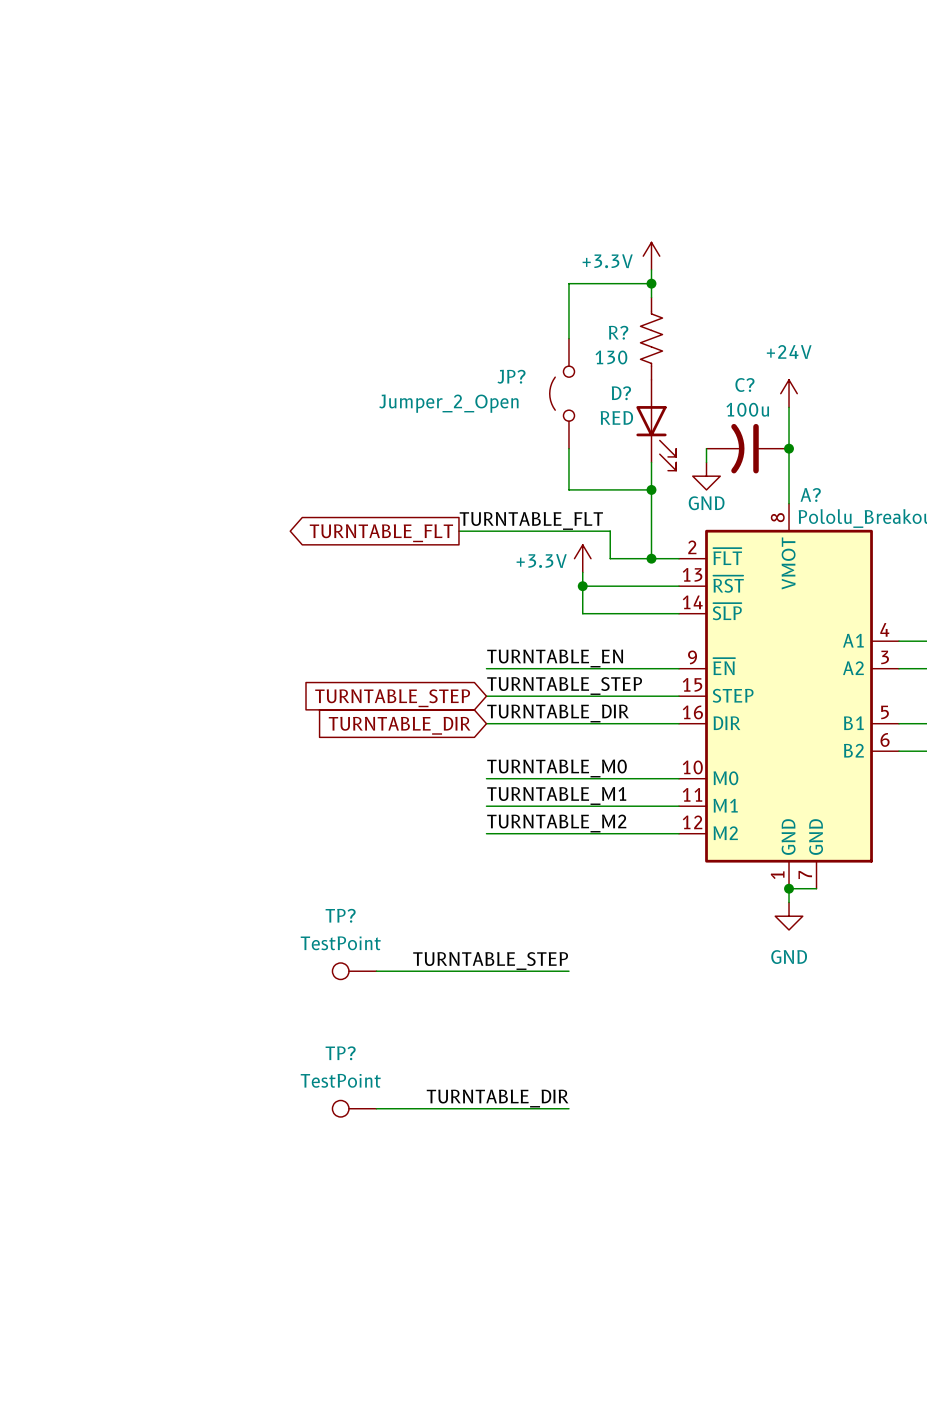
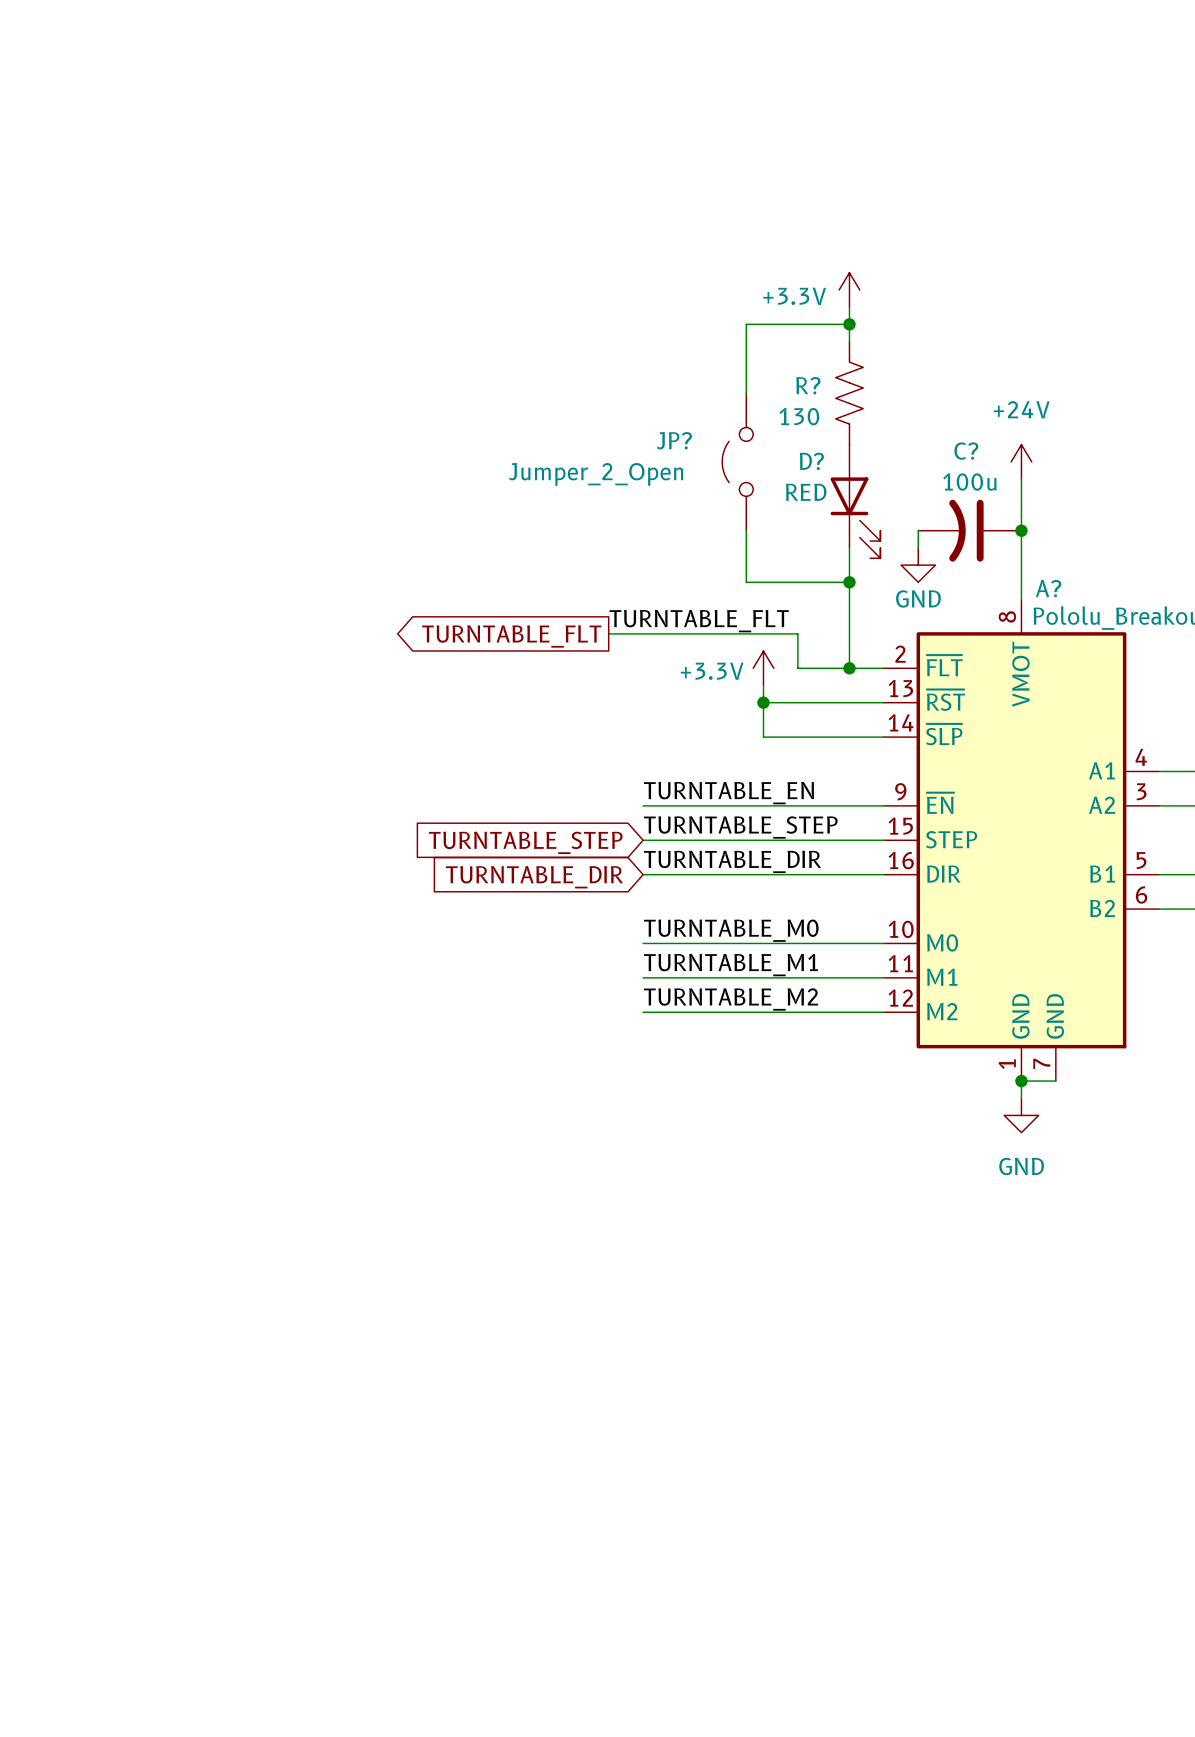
label: TURNTABLE_STEP (490, 961) -> none
TP?: TestPoint (354, 971) -> none
wire: (376, 971) (568, 971) -> none
label: TURNTABLE_DIR (497, 1098) -> none
TP?: TestPoint (354, 1108) -> none
wire: (376, 1108) (568, 1108) -> none

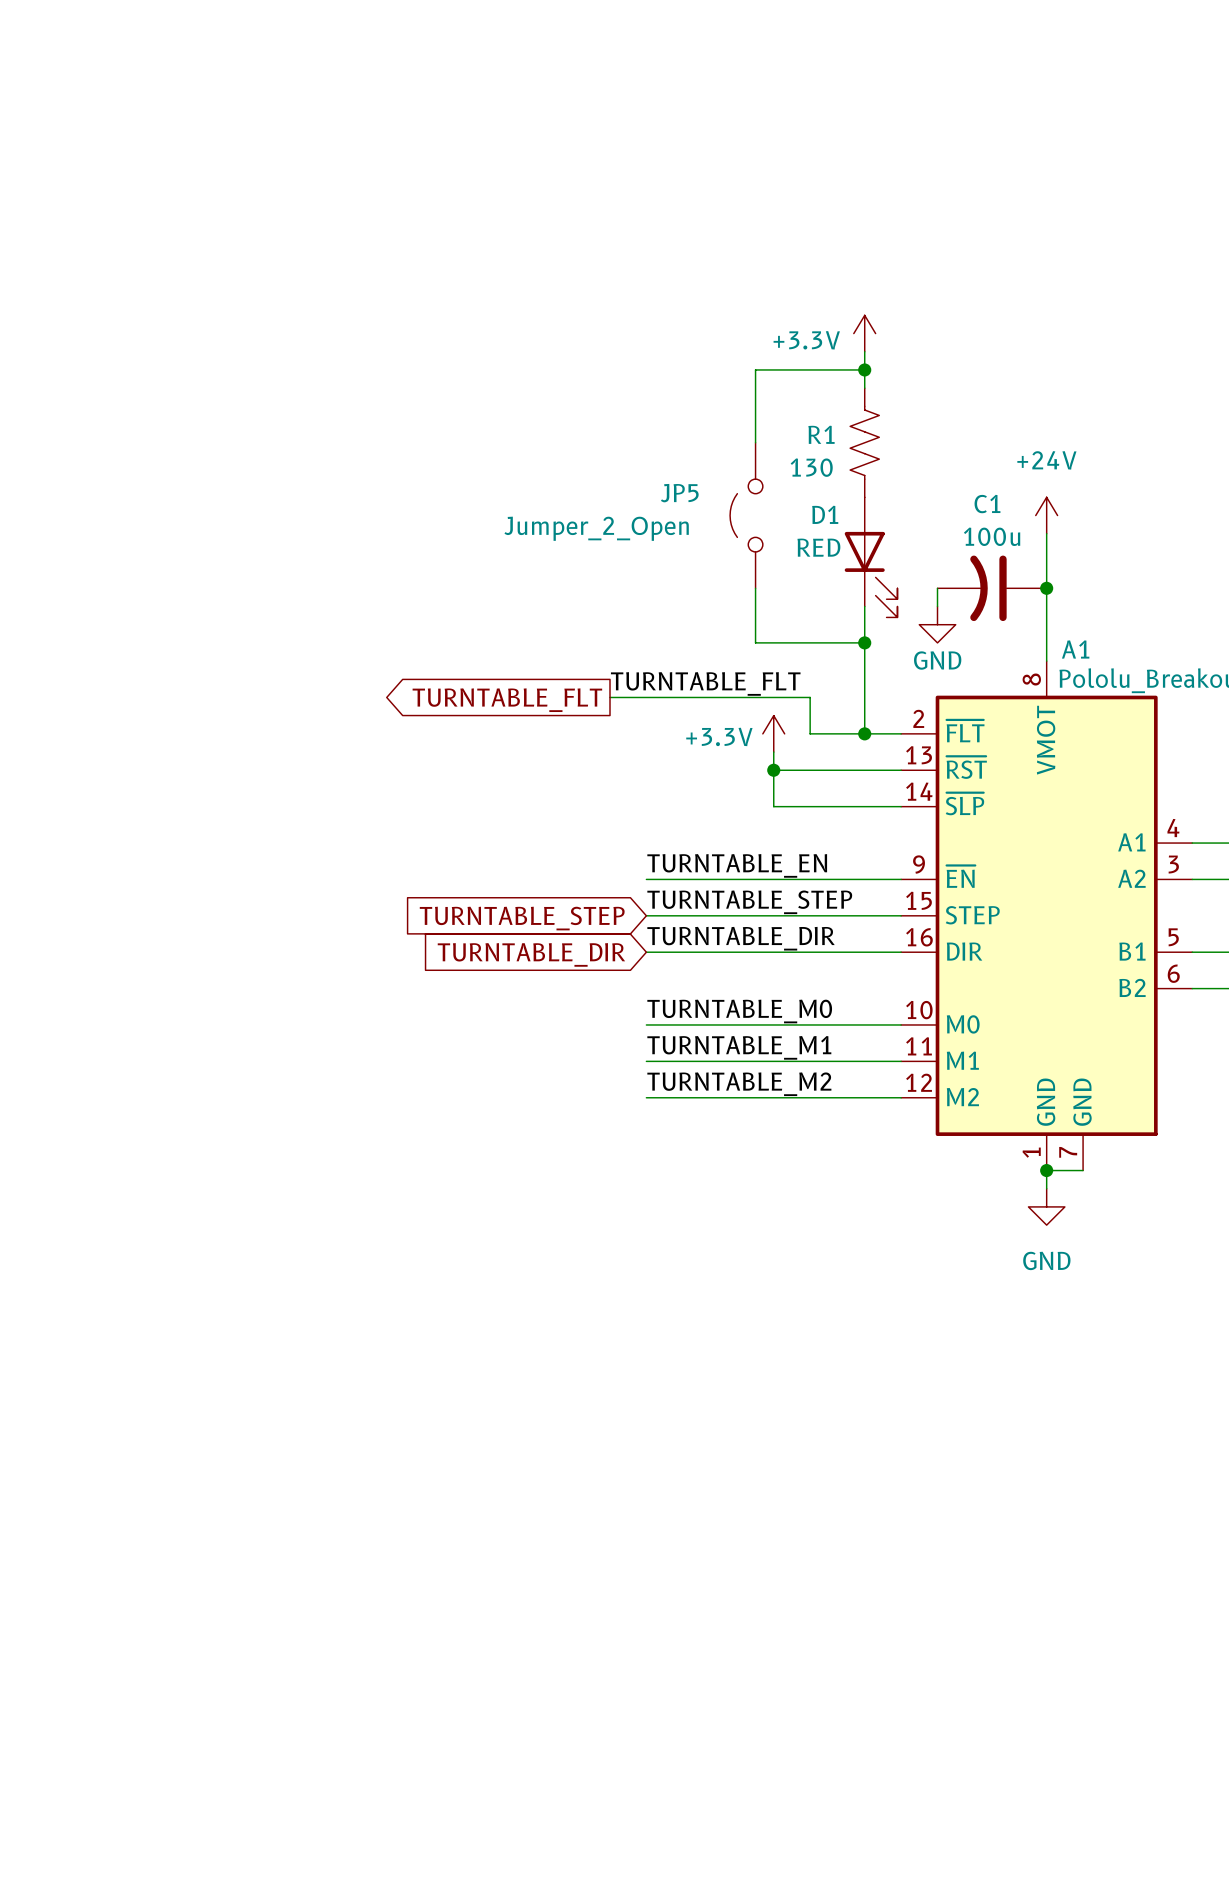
R? name: R? (808, 385) -> R1 (821, 434)
JP? name: JP? (674, 440) -> JP5 (679, 493)
C? name: C? (966, 451) -> C1 (987, 504)
D? name: D? (811, 461) -> D1 (825, 514)
A? name: A? (1048, 588) -> A1 (1075, 649)

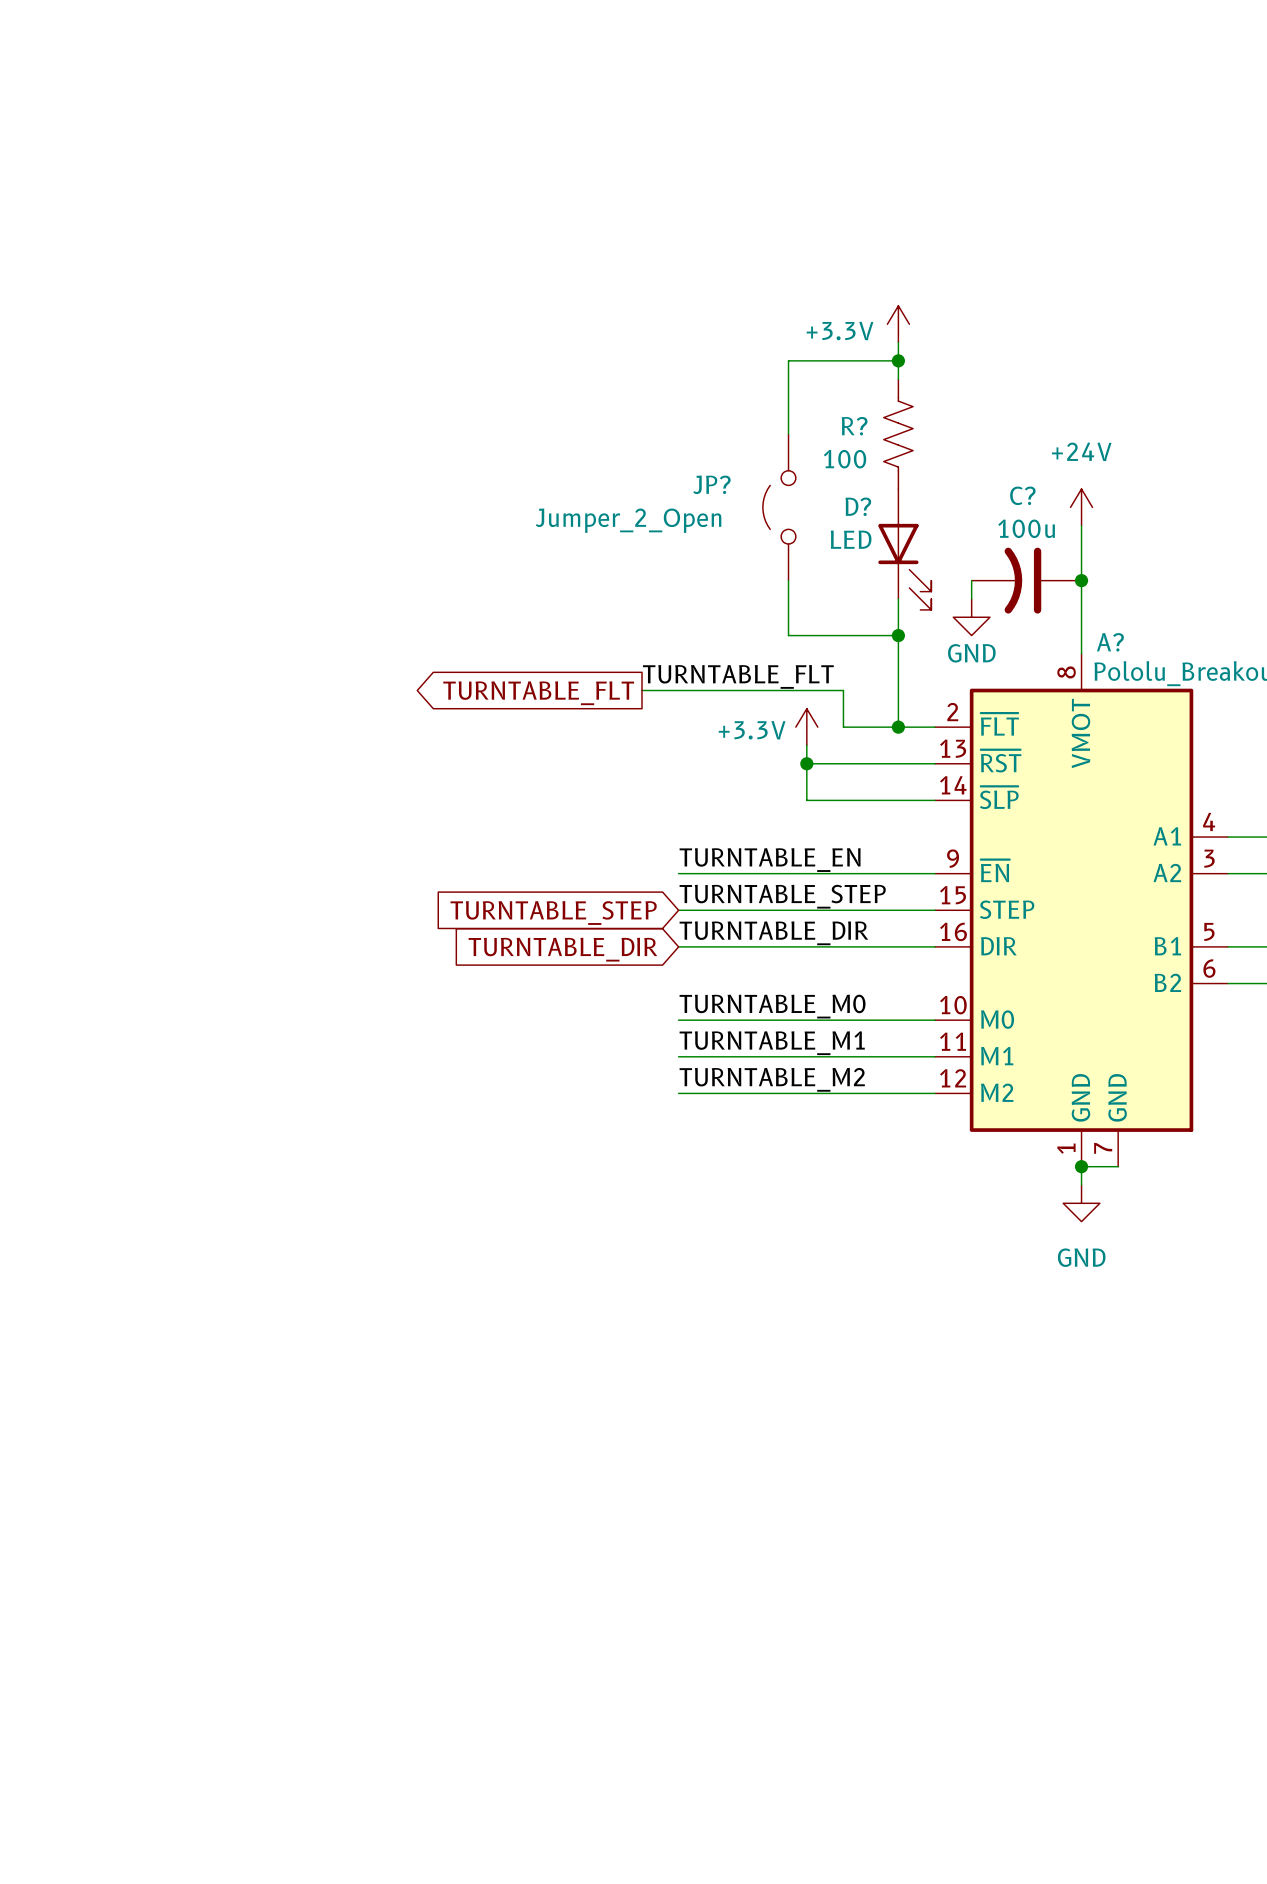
R1 name: R1 (821, 434) -> R? (854, 426)
R1 value: 130 (811, 467) -> 100 (845, 459)
JP5 name: JP5 (679, 493) -> JP? (711, 484)
C1 name: C1 (987, 504) -> C? (1022, 495)
D1 name: D1 (825, 514) -> D? (858, 506)
D1 value: RED (818, 547) -> LED (851, 539)
A1 name: A1 (1075, 649) -> A? (1110, 642)

